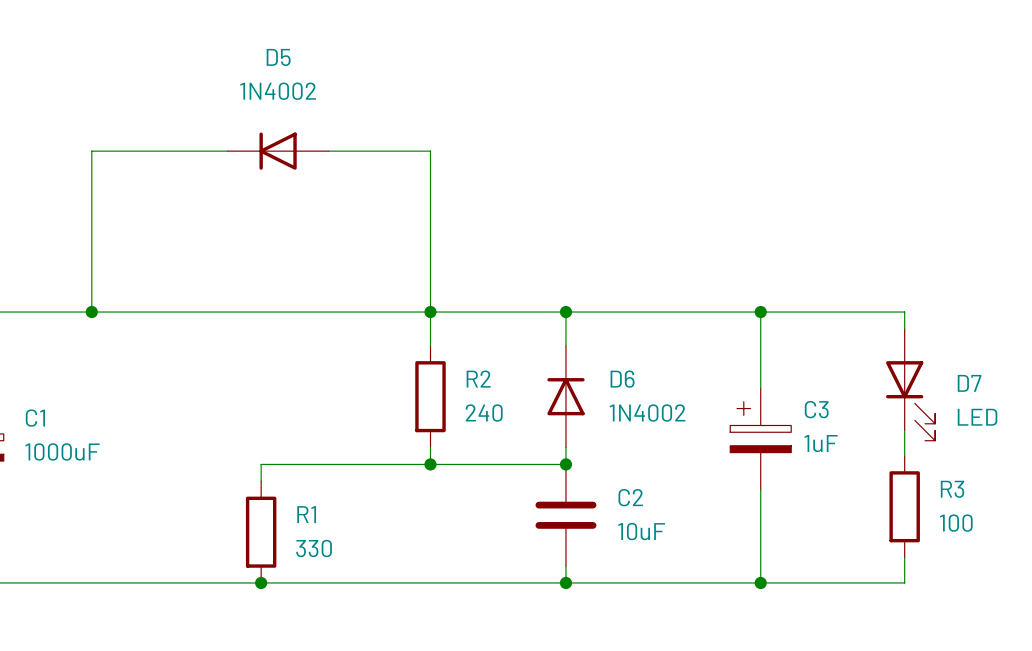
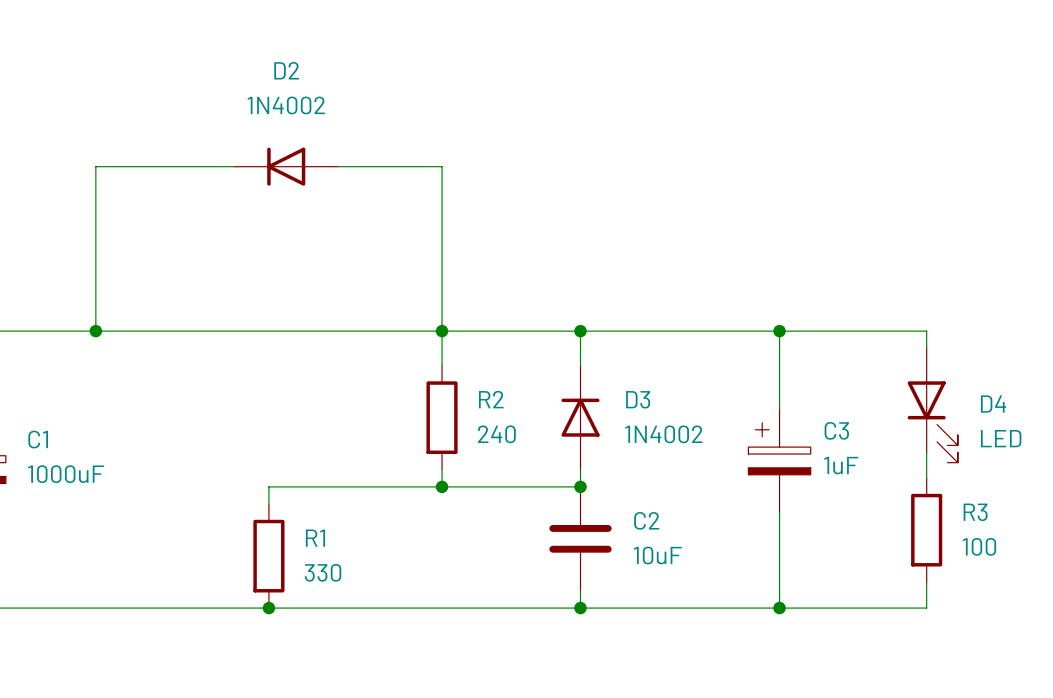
D5 name: D5 (278, 57) -> D2 (286, 70)
D6 name: D6 (622, 379) -> D3 (638, 399)
D7 name: D7 (969, 383) -> D4 (993, 404)

